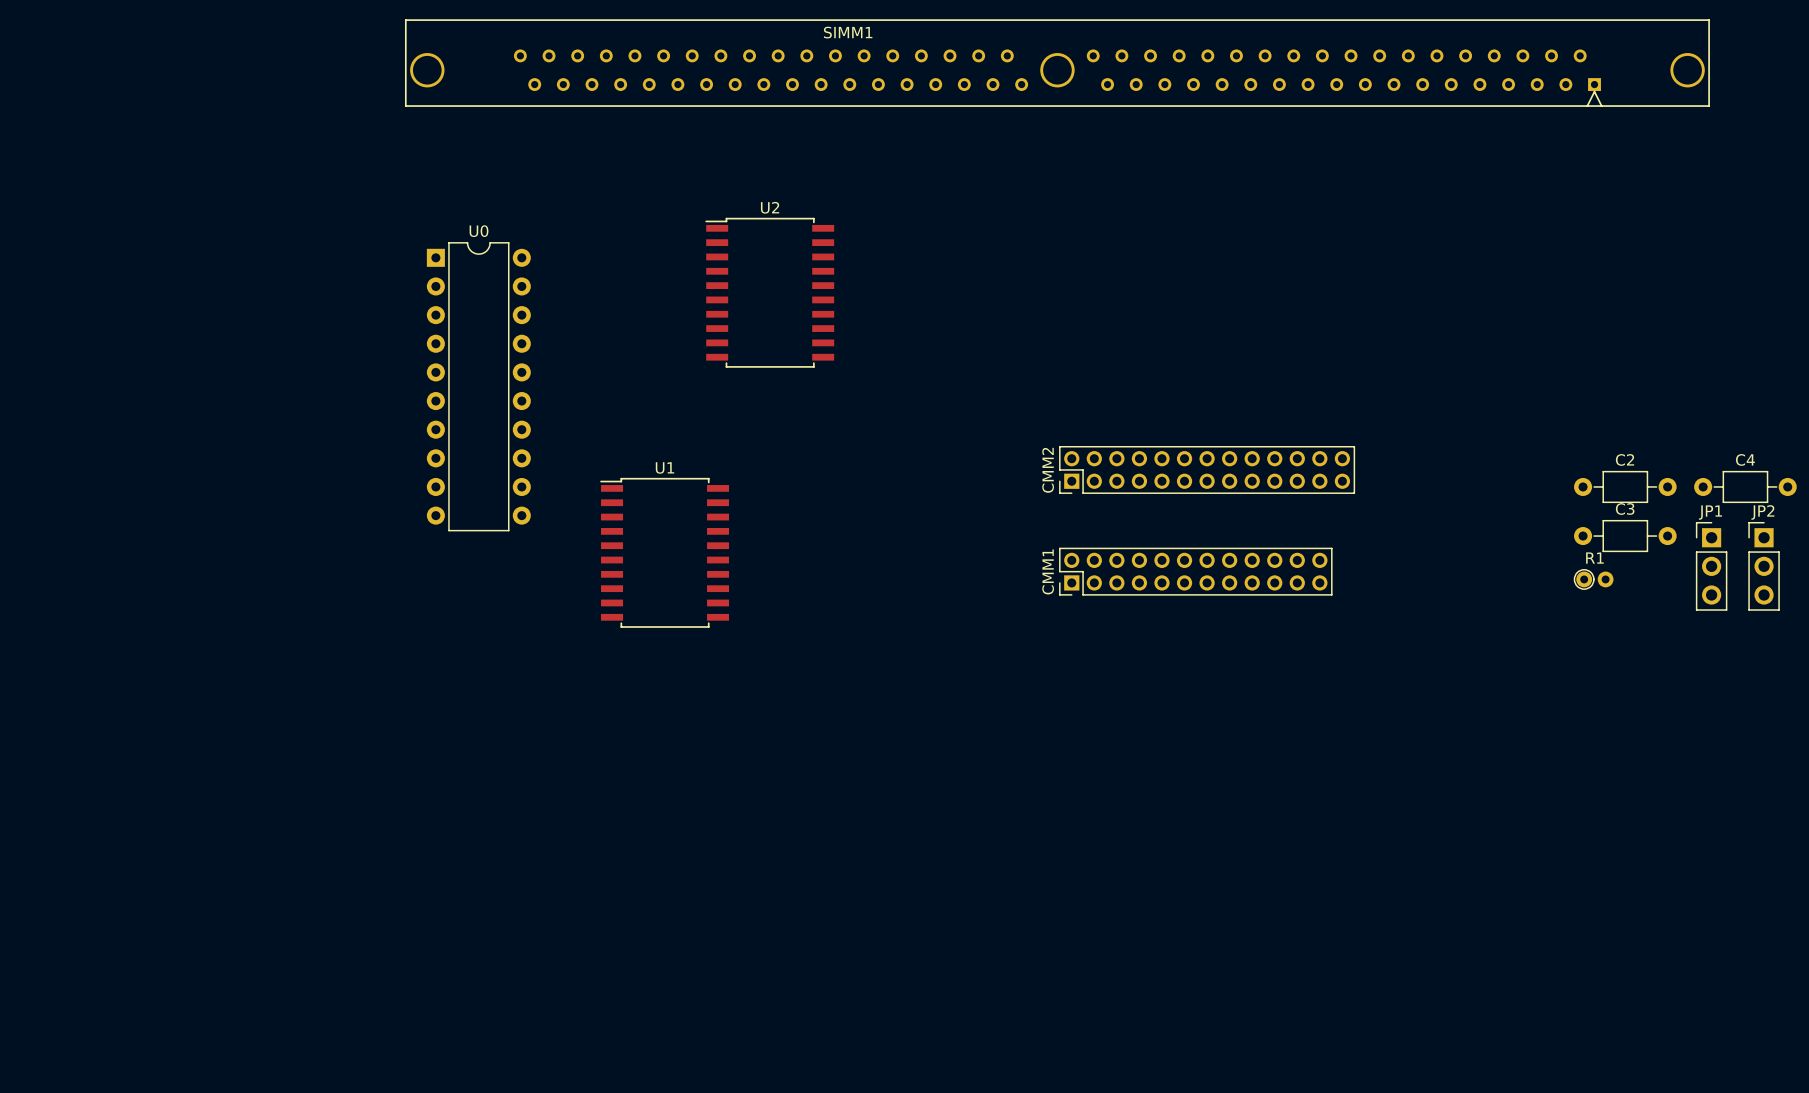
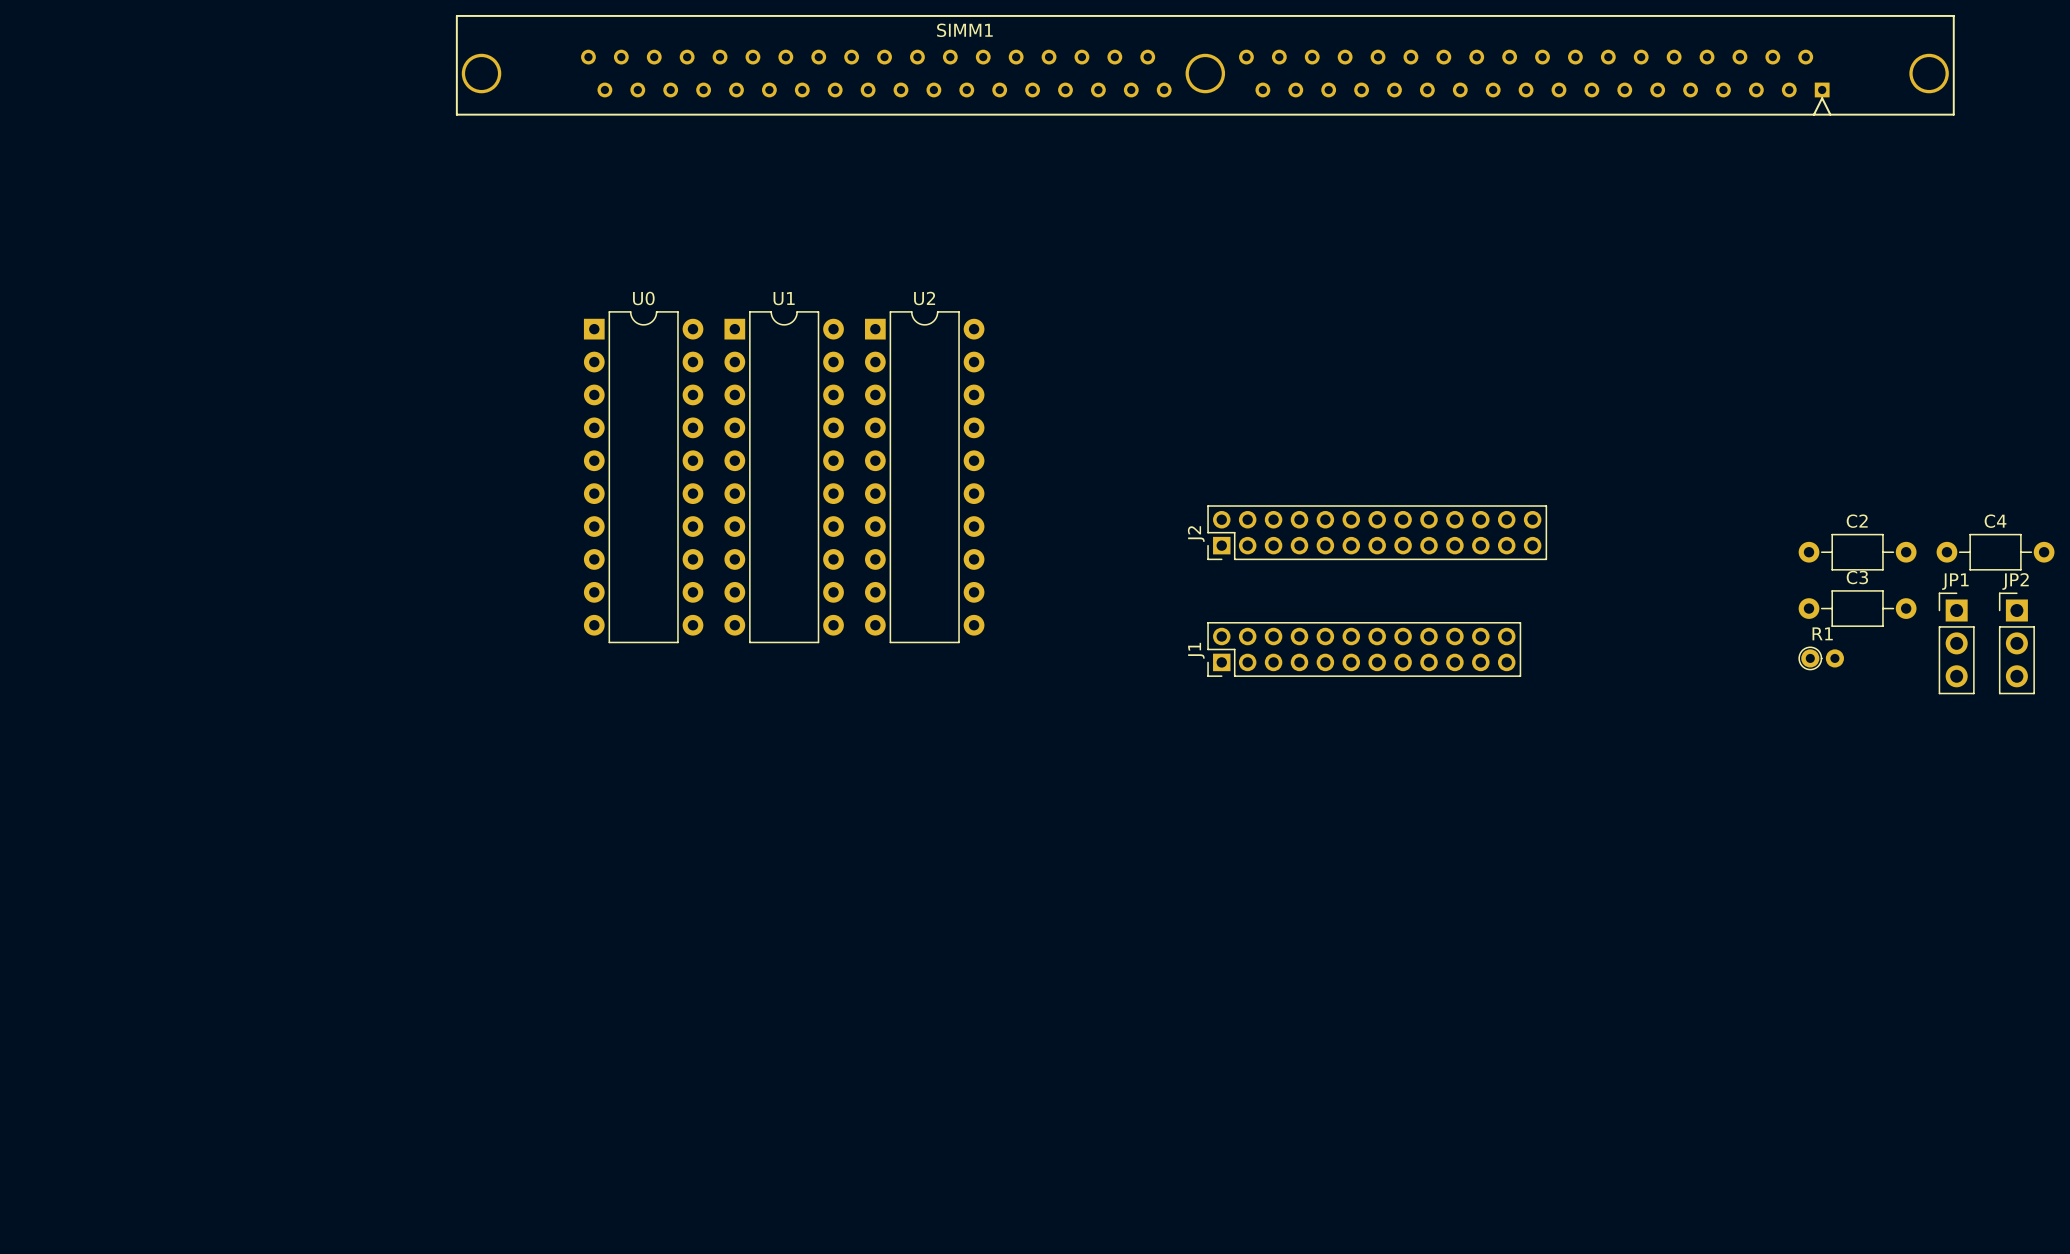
U2 name position: U2 (770, 207) -> U2 (924, 298)
U2 footprint: [705, 217, 835, 368] -> [865, 311, 985, 644]
U0 position: (478, 386) -> (643, 477)
U1 name position: U1 (664, 467) -> U1 (784, 298)
CMM2 name: CMM2 (1048, 470) -> J2 (1196, 534)
U1 footprint: [600, 477, 730, 628] -> [724, 311, 844, 644]
CMM1 name: CMM1 (1048, 571) -> J1 (1196, 650)

